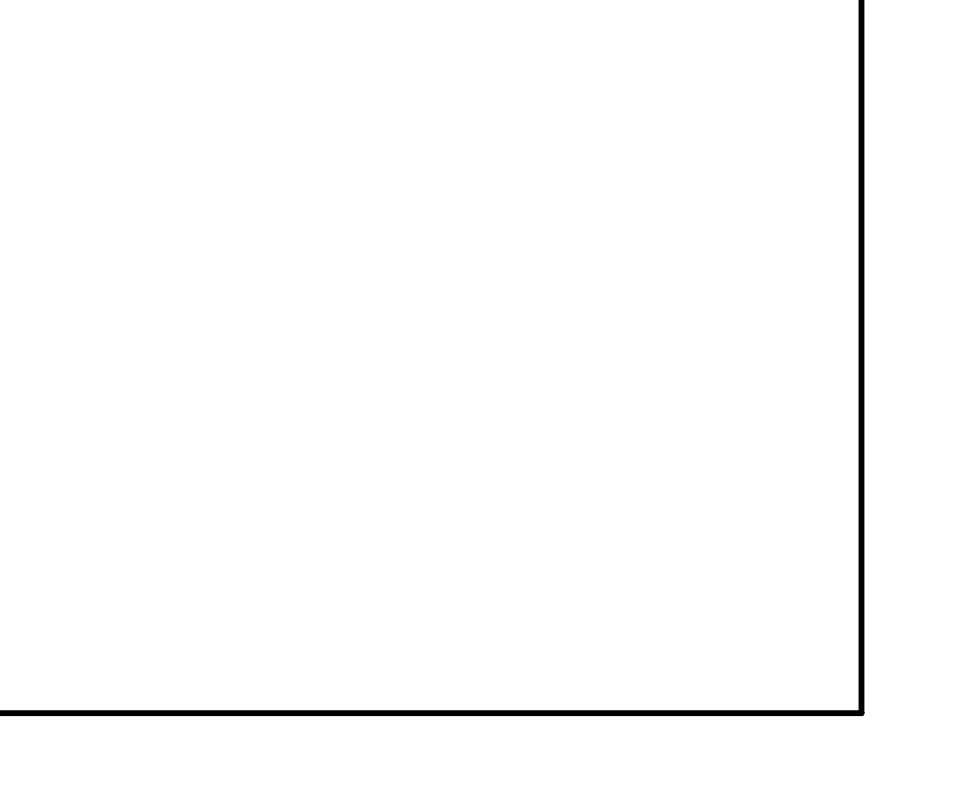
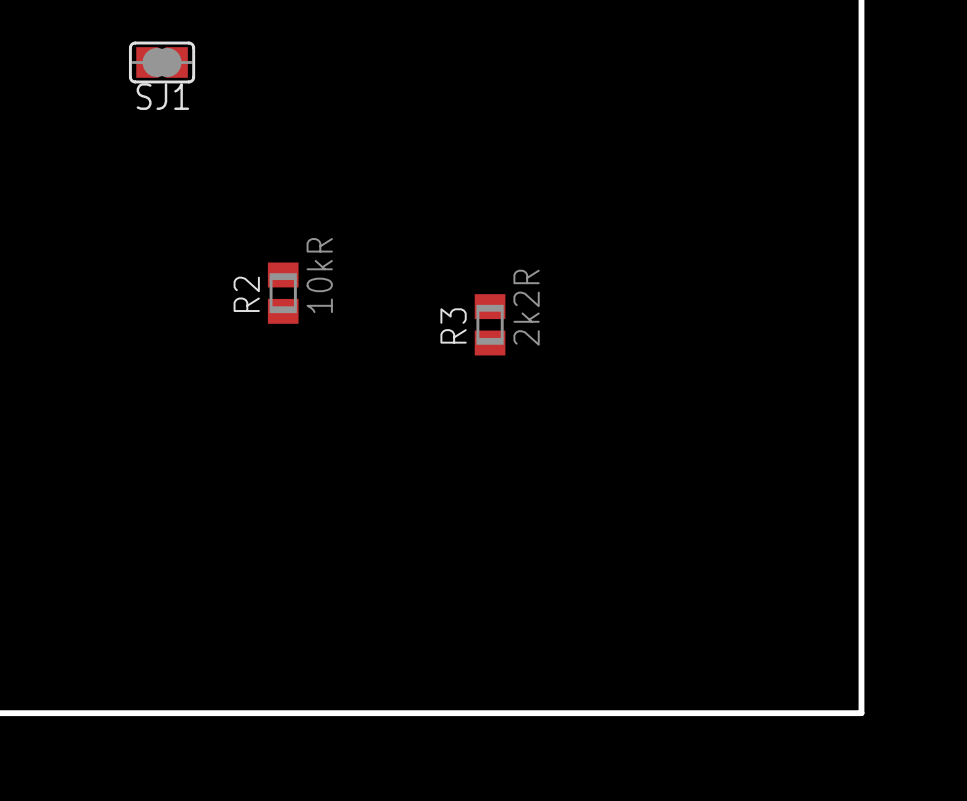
SJ1: none -> (162, 62)
R2: none -> 10kR (283, 293)
R3: none -> 2k2R (490, 324)

